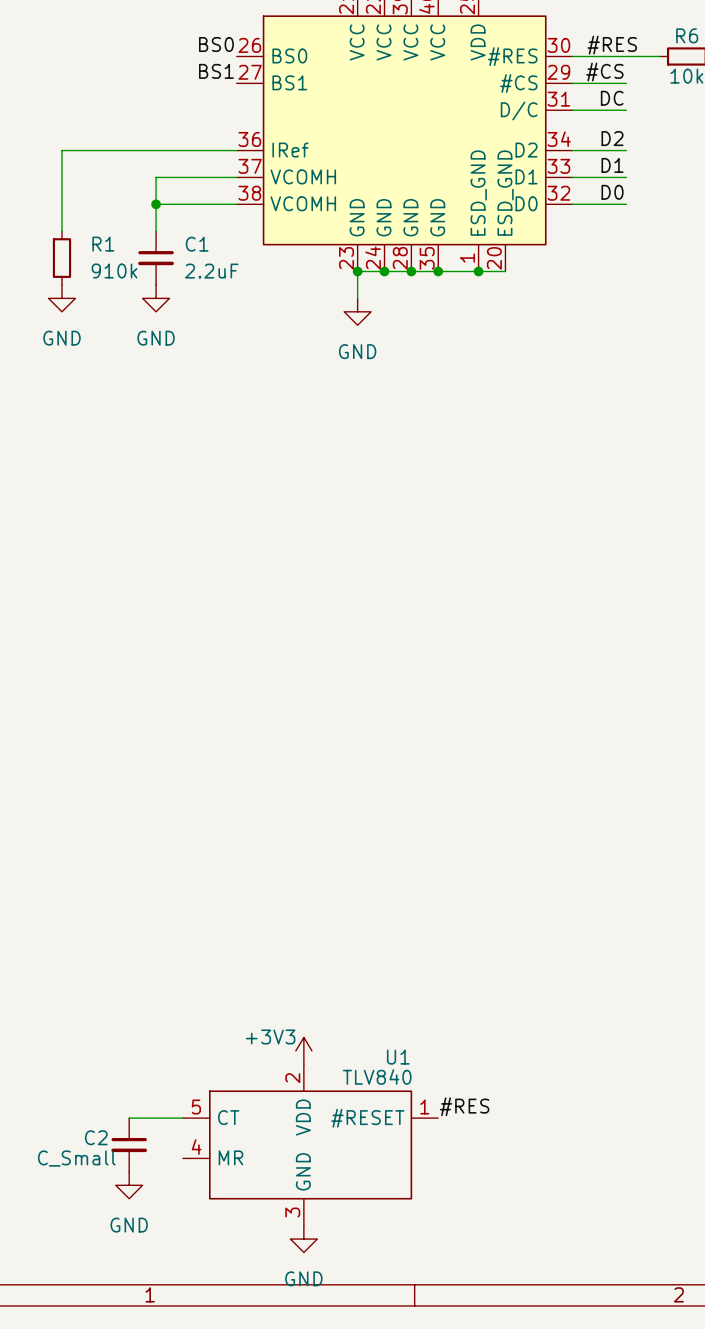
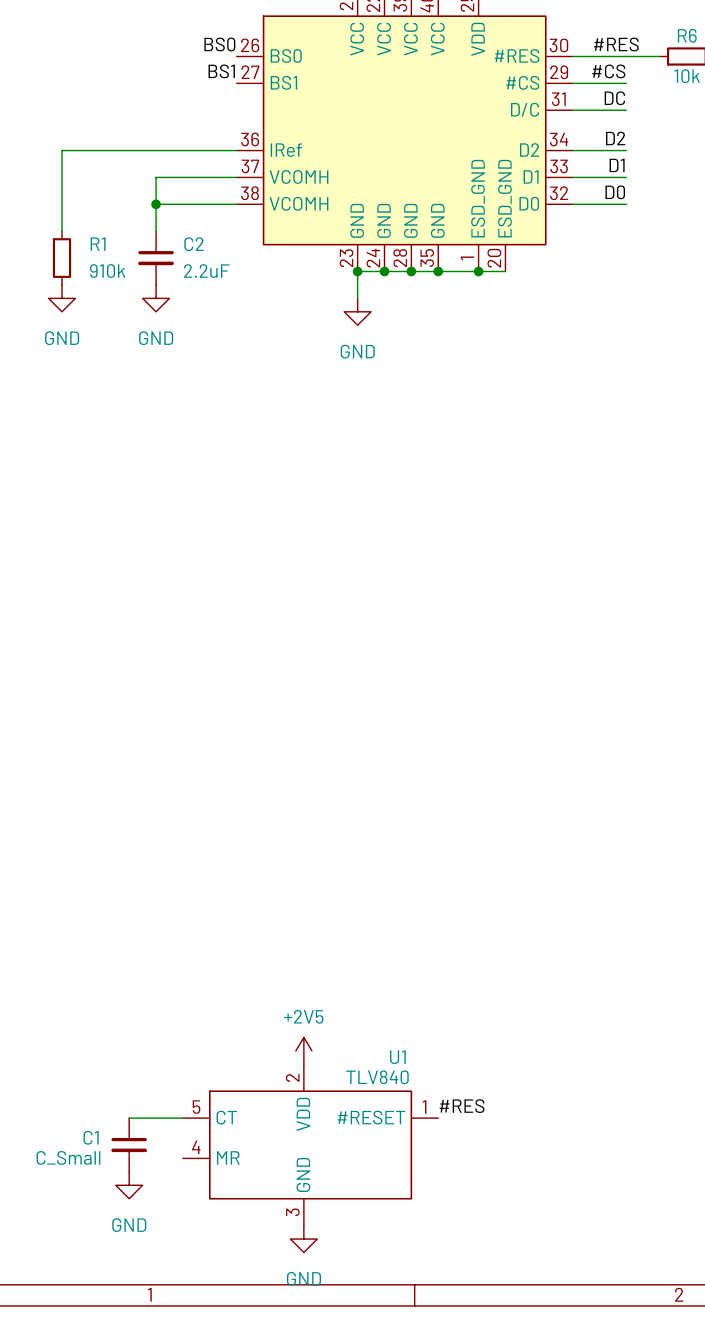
C1 name: C1 (197, 244) -> C2 (194, 244)
power symbol: +3V3 (303, 1050) -> +2V5 (303, 1050)
C2 name: C2 (96, 1137) -> C1 (91, 1137)

